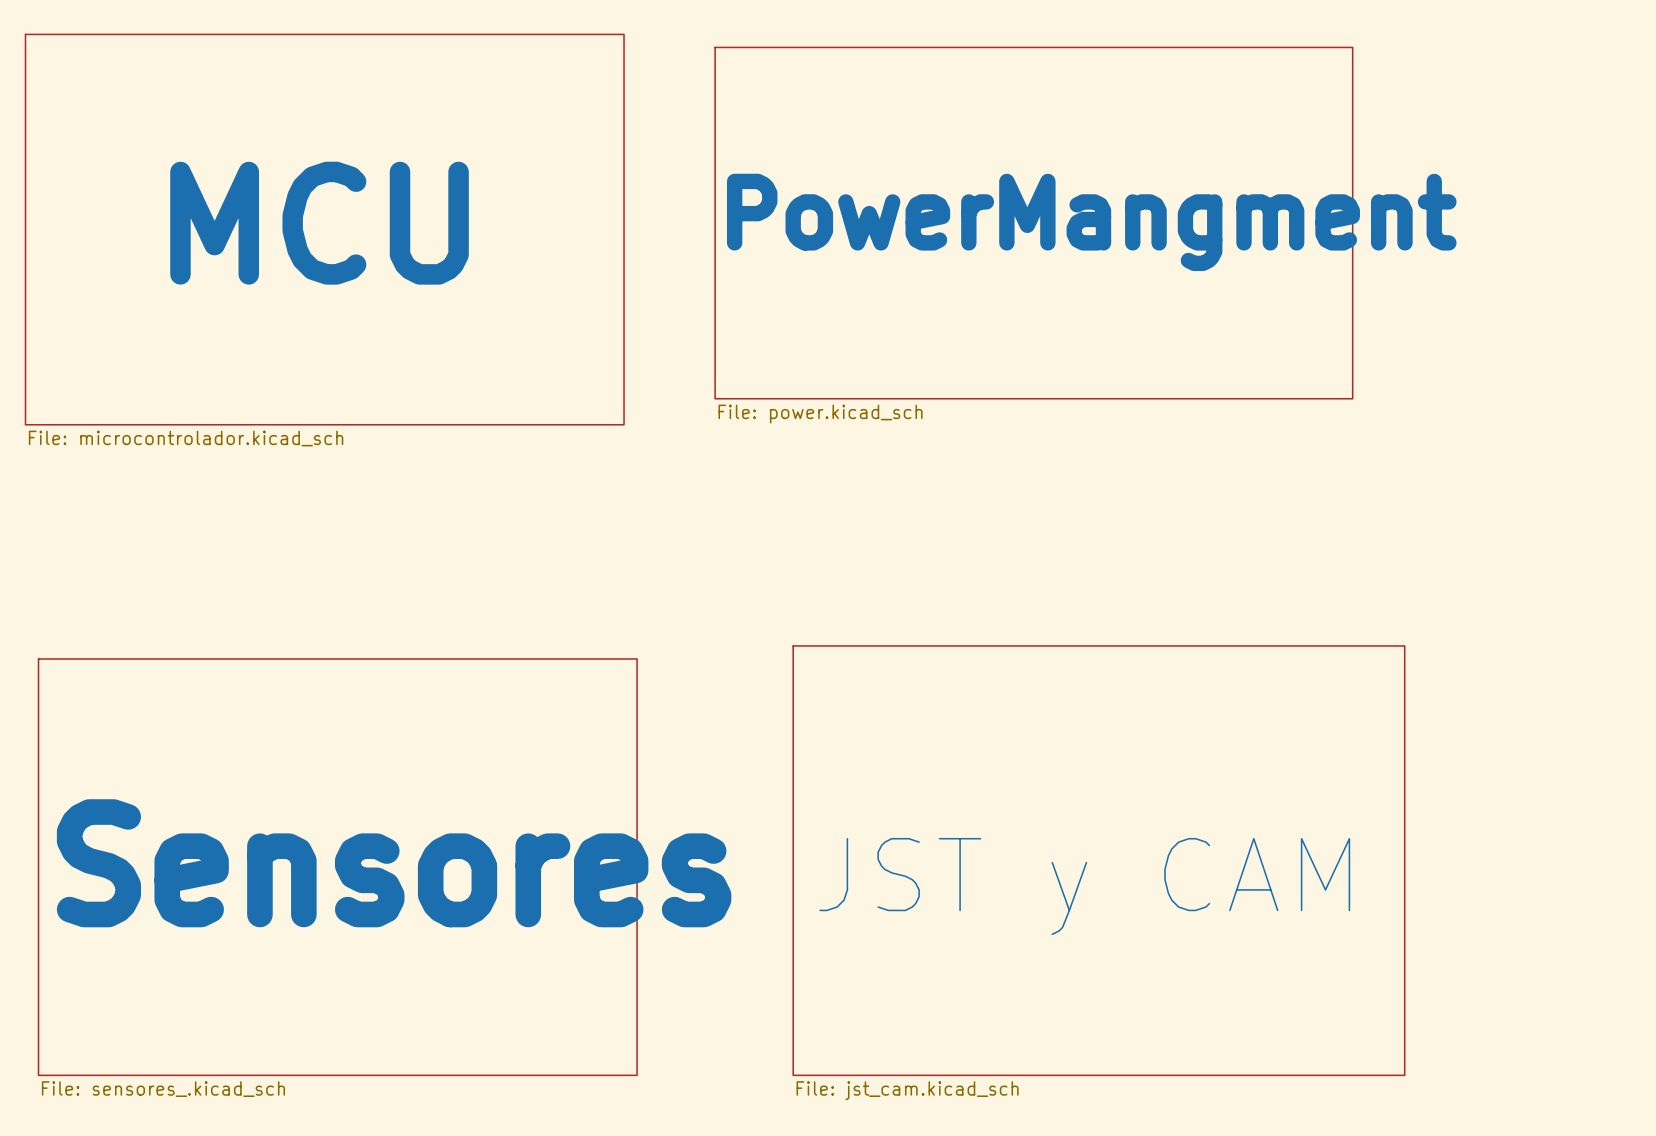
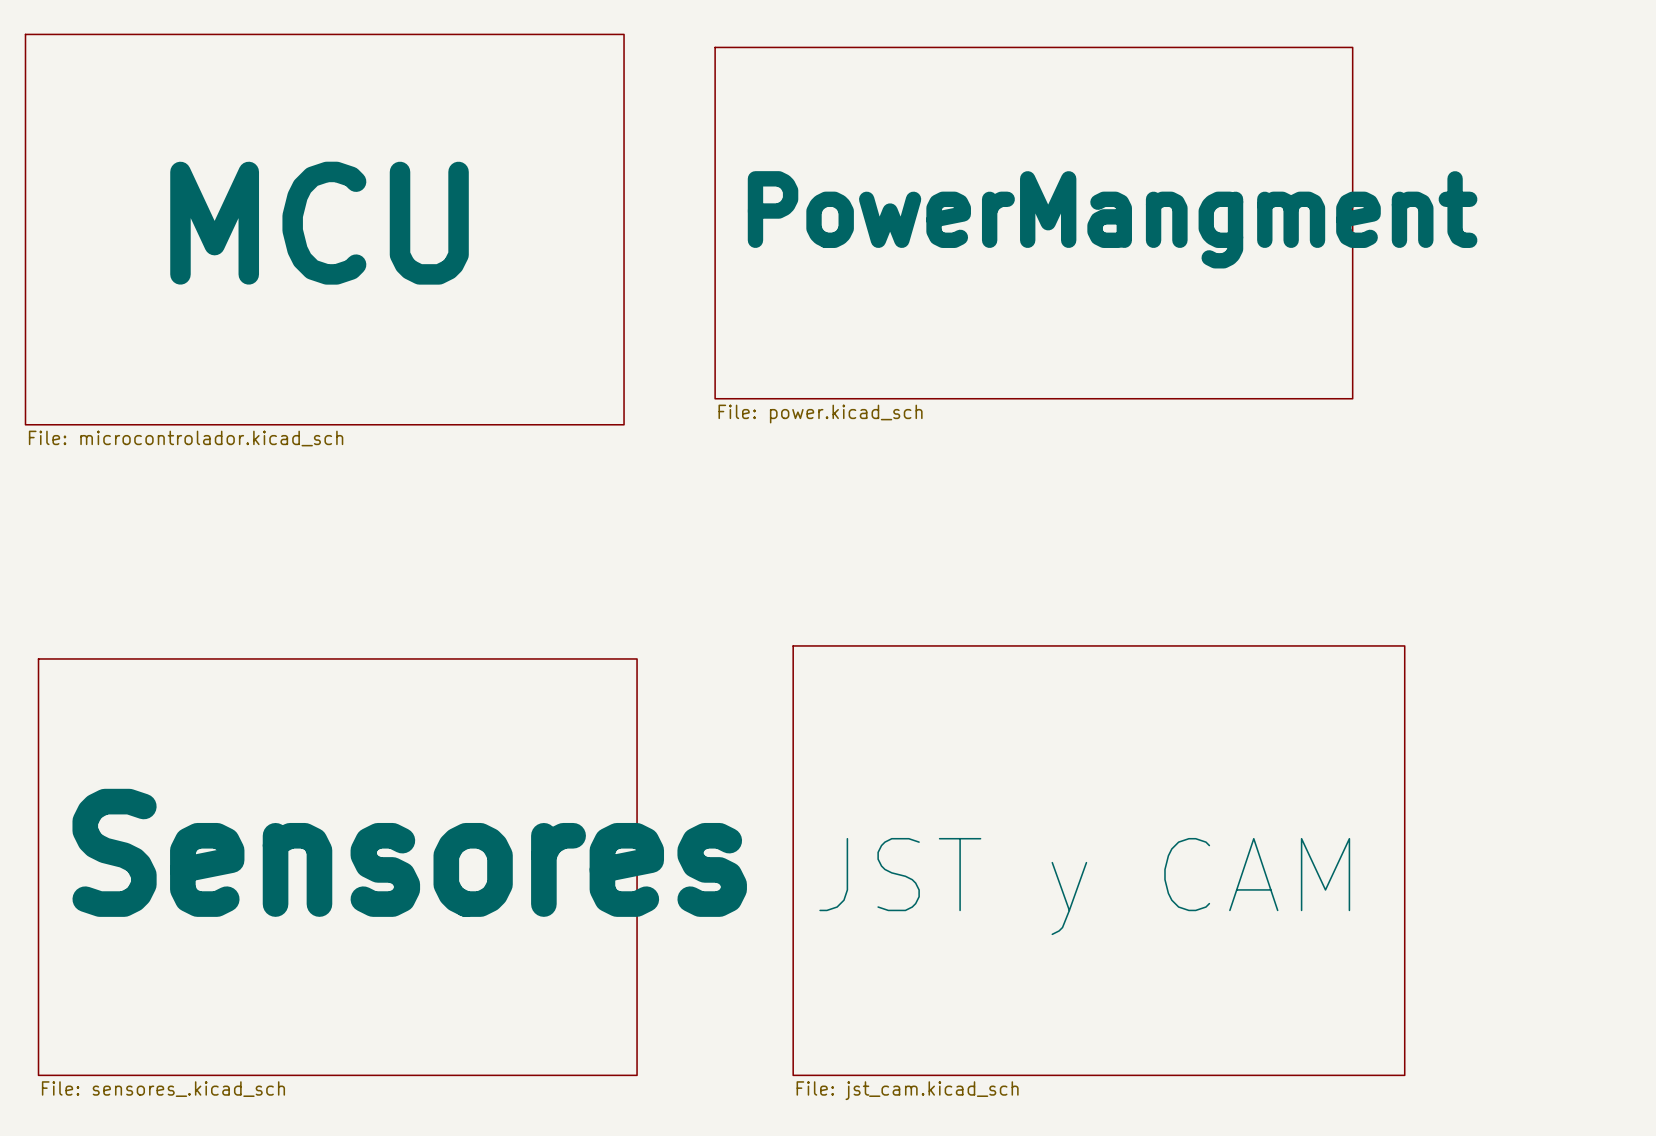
sheet PowerMangment name position: PowerMangment (1091, 222) -> PowerMangment (1112, 219)
sheet Sensores name position: Sensores (394, 863) -> Sensores (409, 852)

